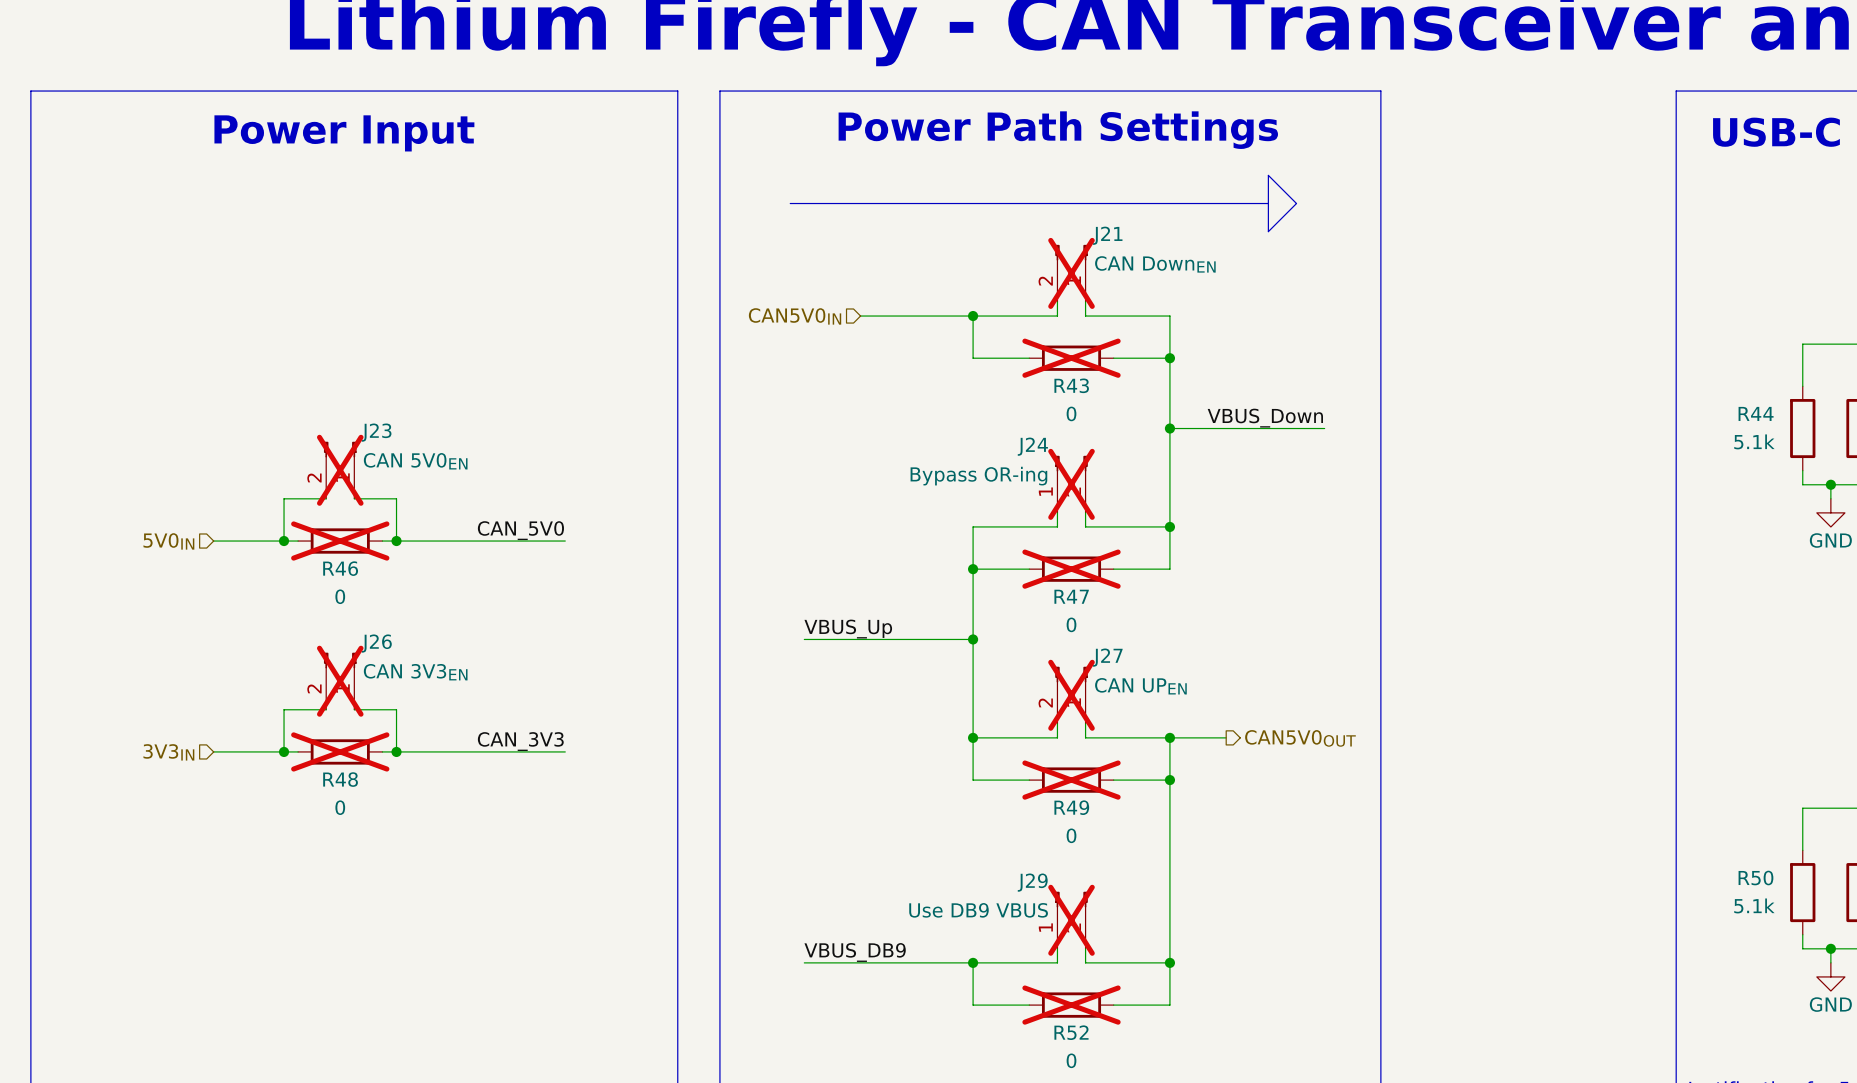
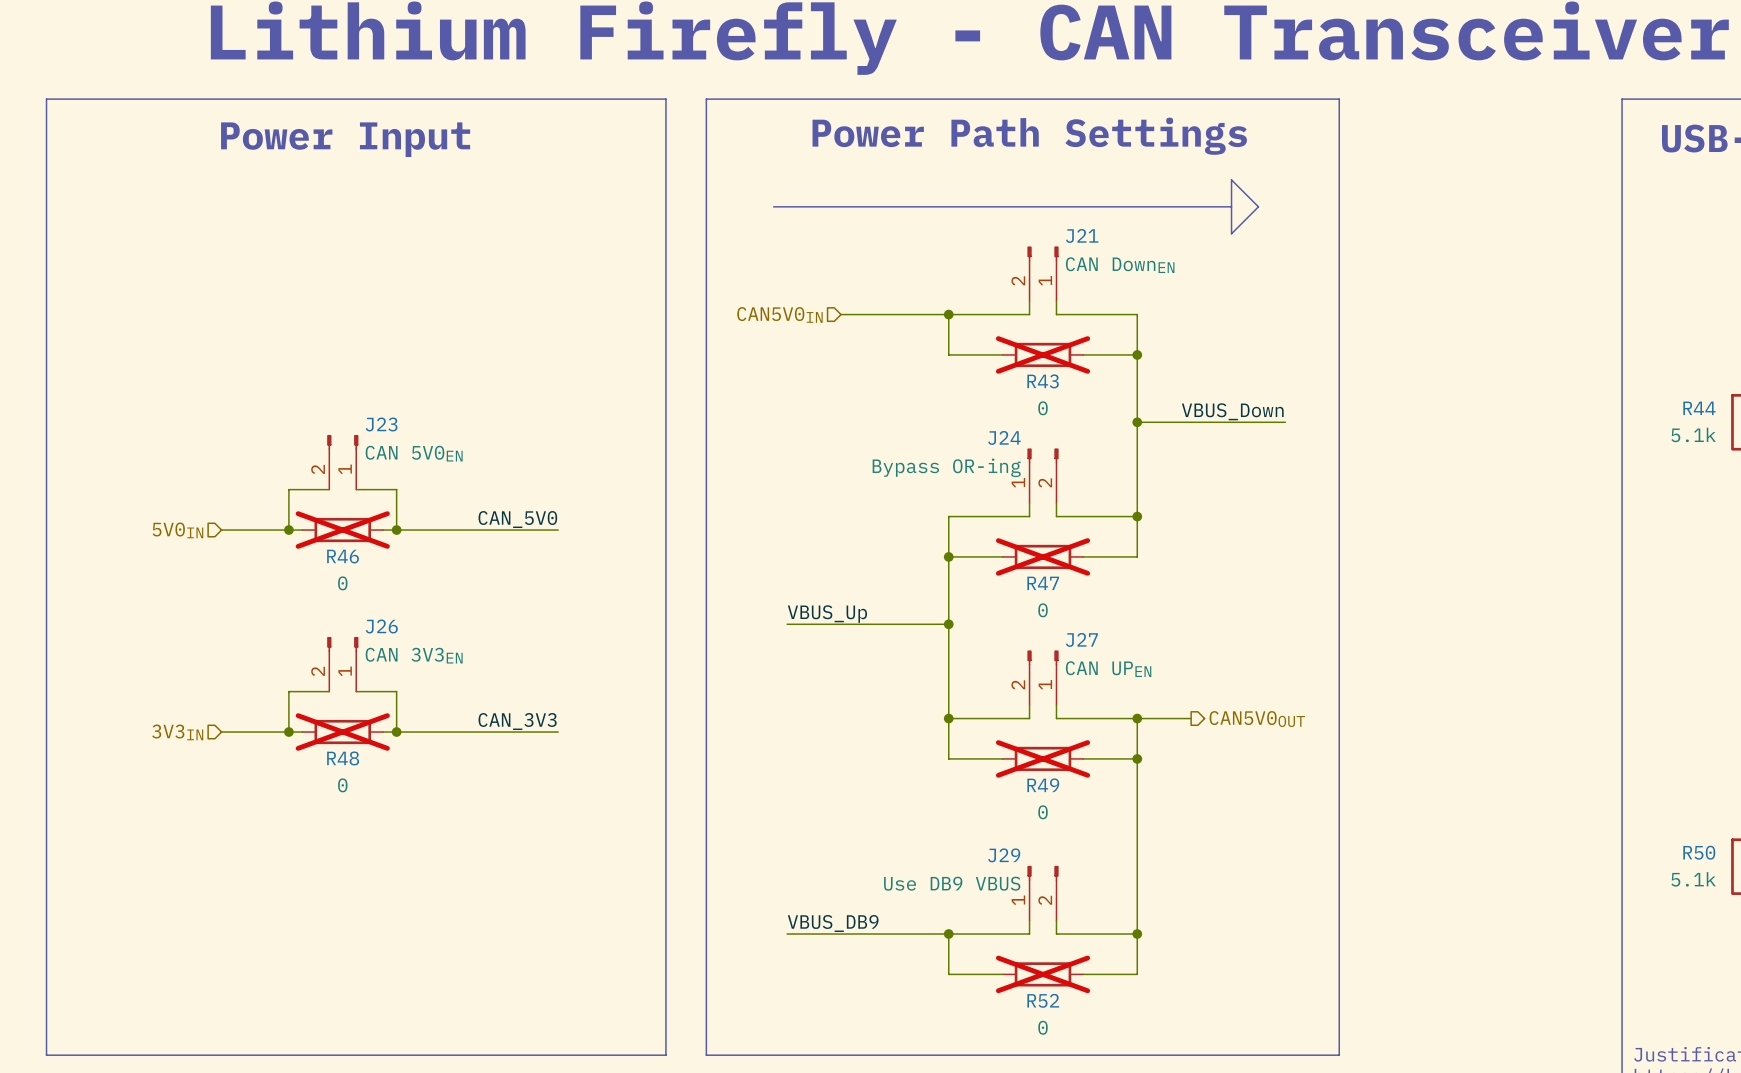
J21 do-not-place cross: (1071, 273) -> none
J23 do-not-place cross: (340, 470) -> none
J24 do-not-place cross: (1071, 484) -> none
J26 do-not-place cross: (340, 681) -> none
J27 do-not-place cross: (1071, 695) -> none
J29 do-not-place cross: (1071, 920) -> none

